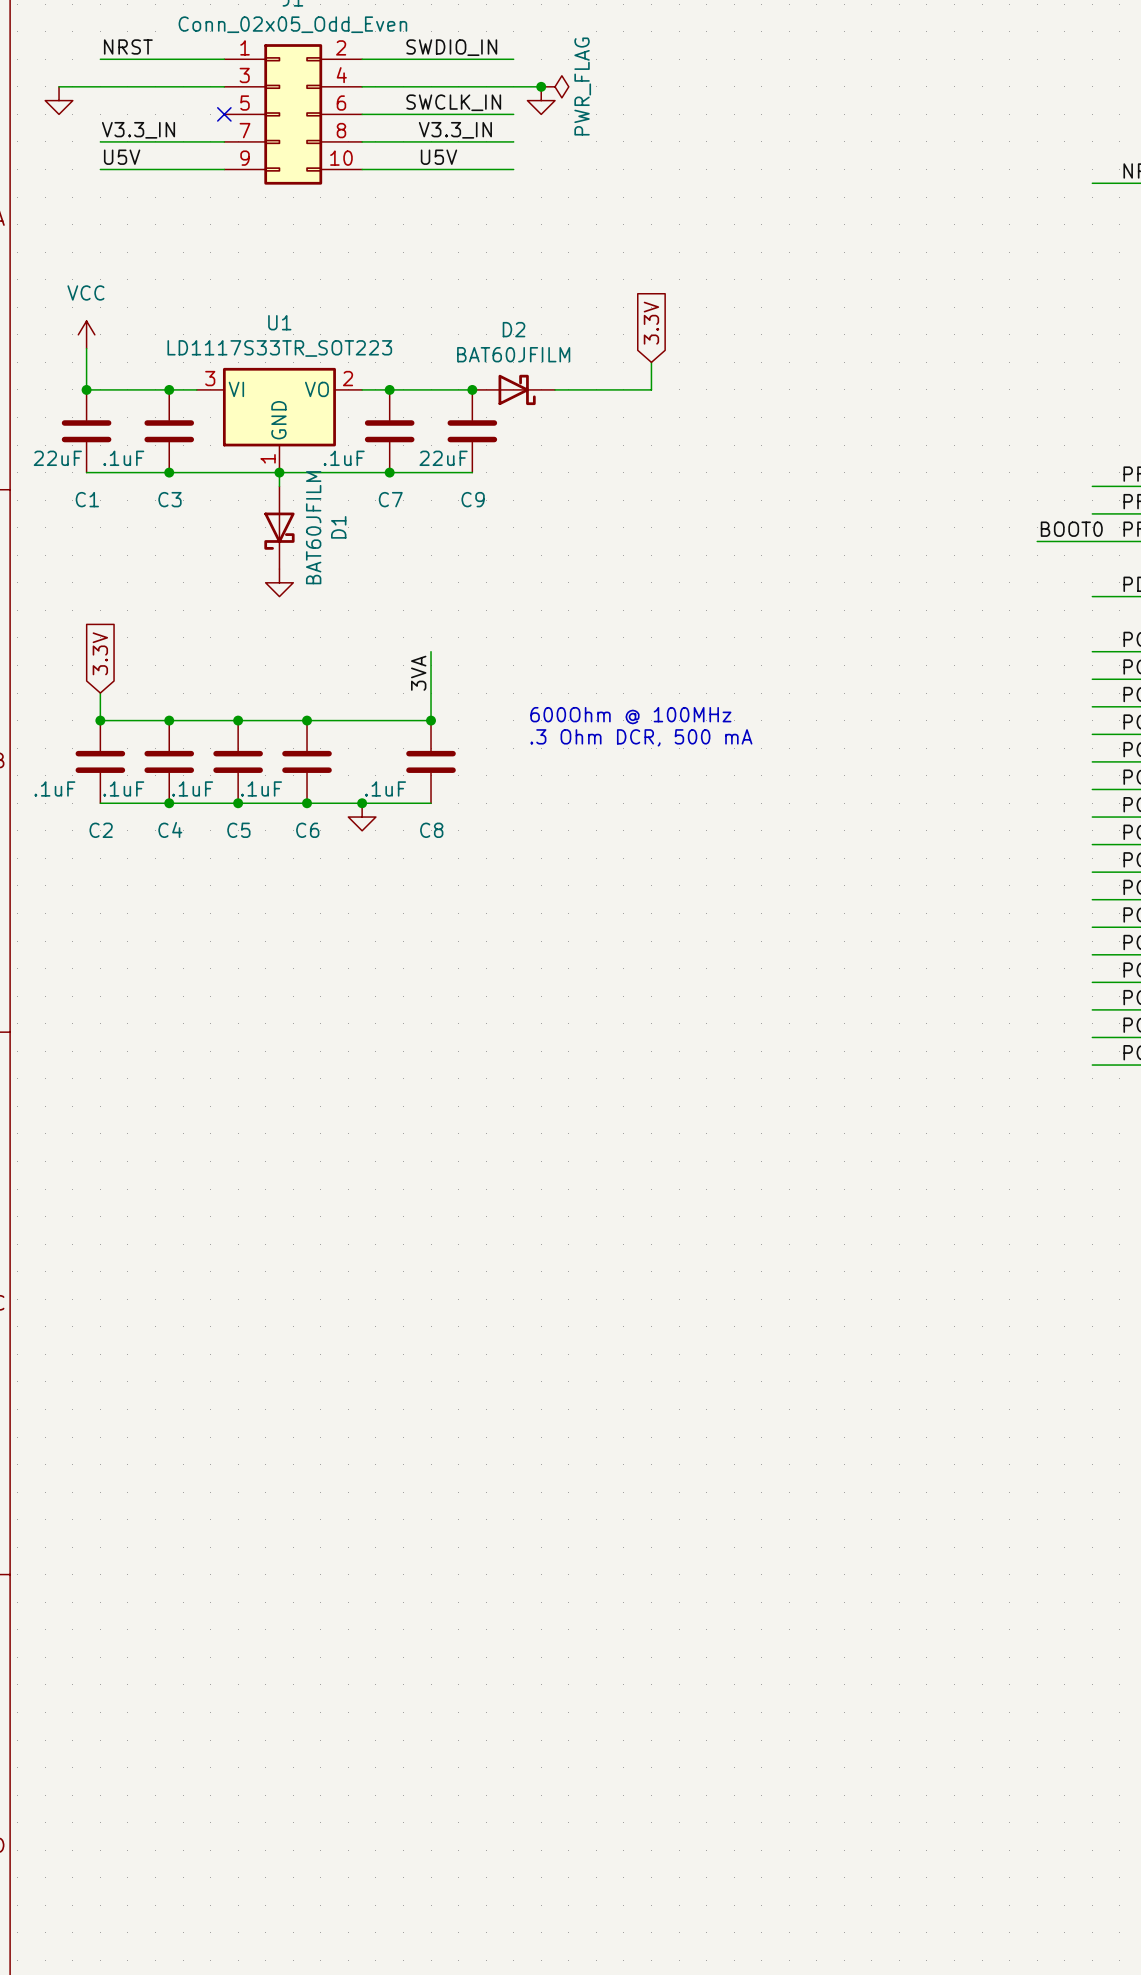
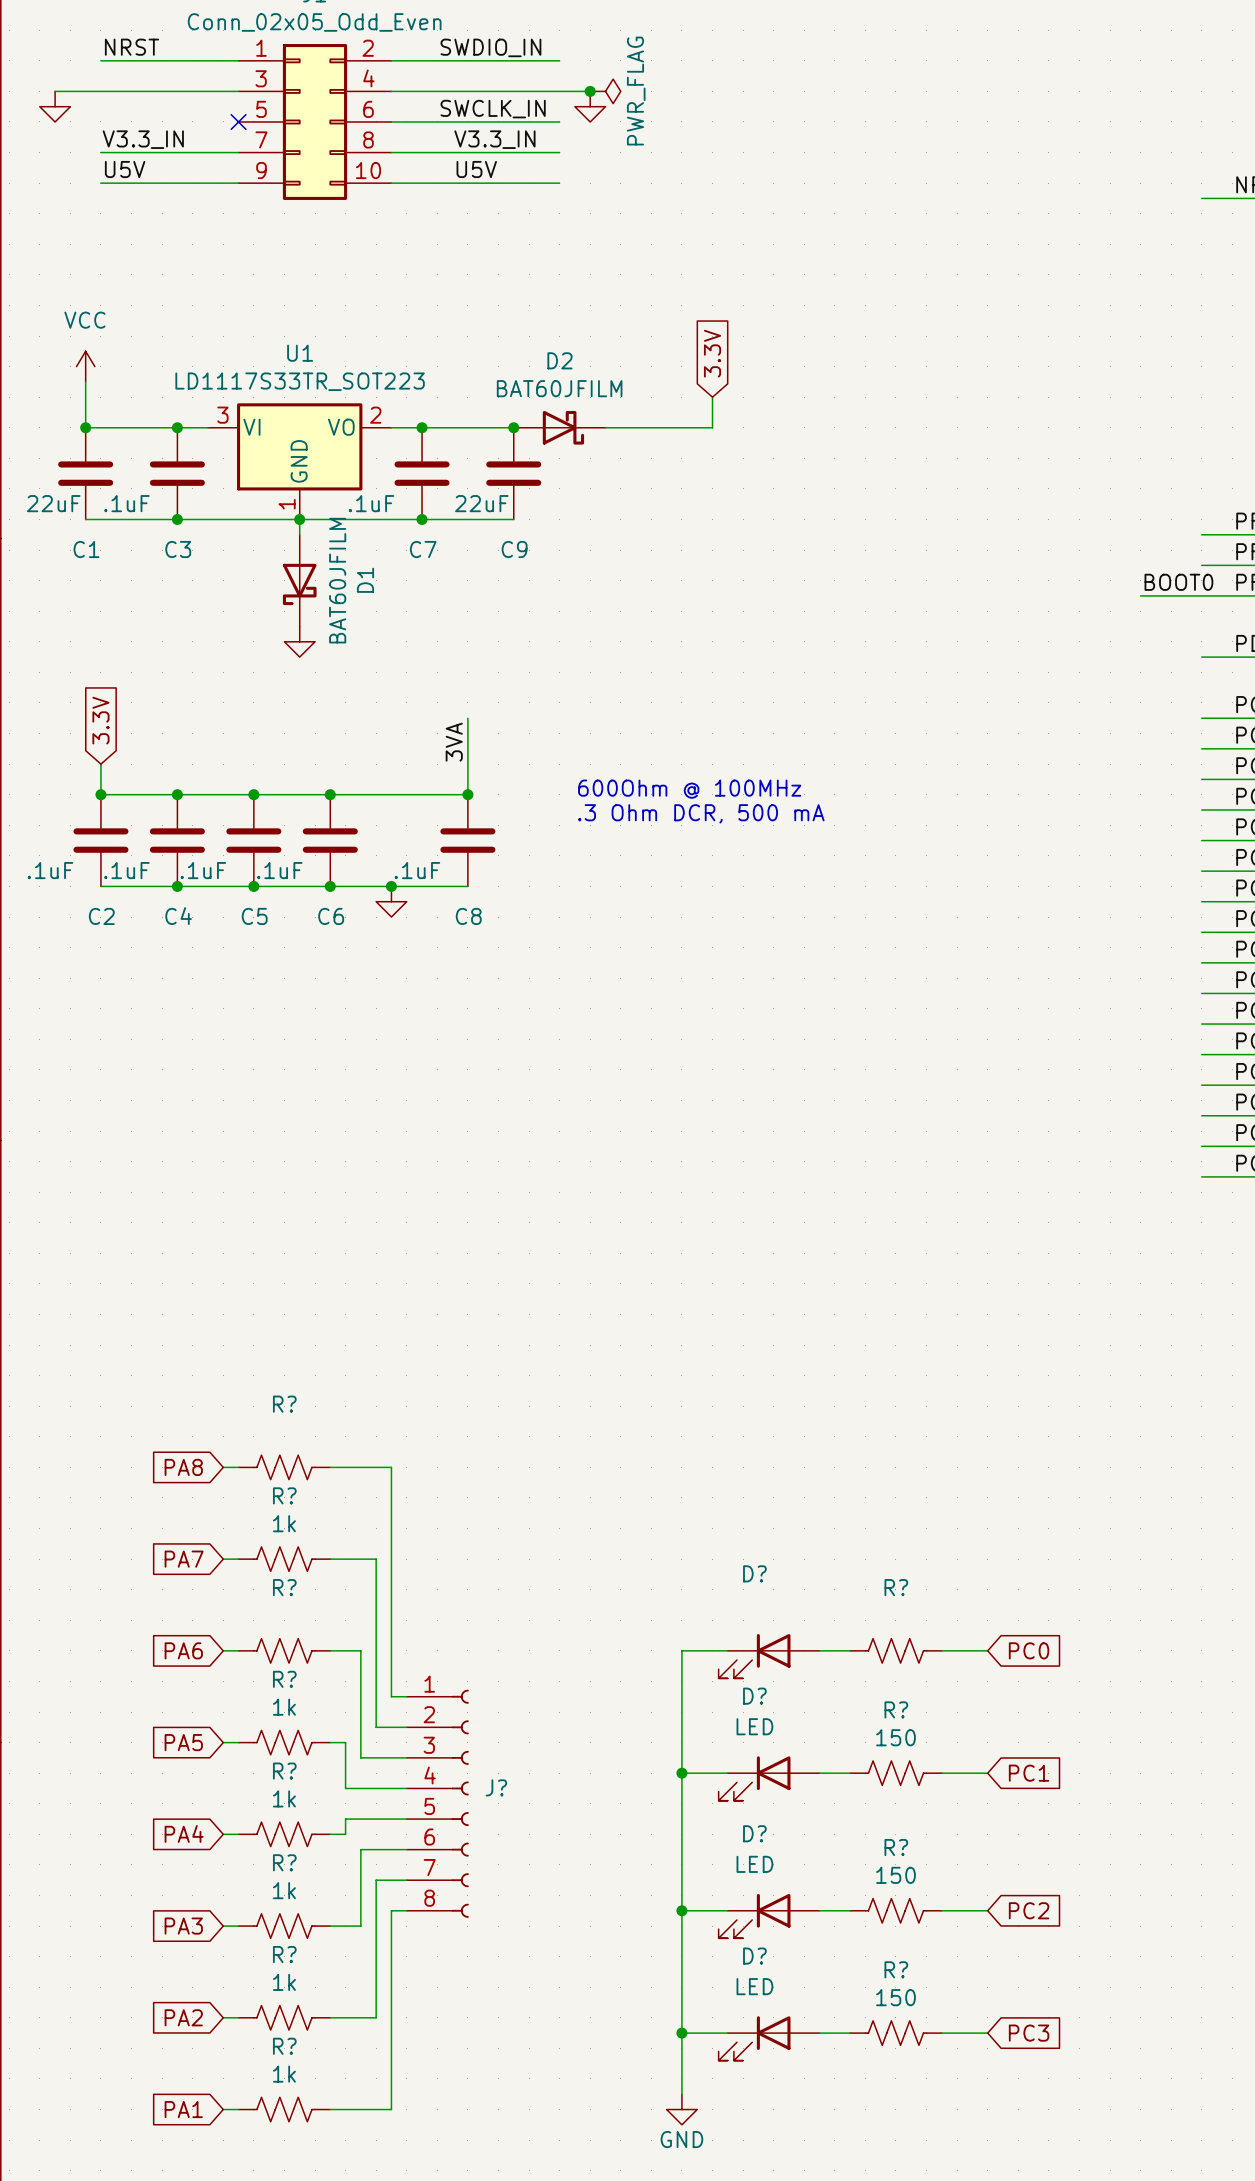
global label: none -> PA8 (183, 1467)
wire: none -> (223, 1467) (238, 1467)
R?: none -> (284, 1467)
wire: none -> (330, 1467) (391, 1467) (391, 1696) (406, 1696)
global label: none -> PA7 (184, 1559)
wire: none -> (223, 1559) (238, 1559)
R?: none -> 1k (284, 1559)
wire: none -> (330, 1559) (376, 1559) (376, 1727) (406, 1727)
global label: none -> PA6 (183, 1650)
wire: none -> (223, 1650) (238, 1650)
R?: none -> (284, 1650)
wire: none -> (330, 1650) (360, 1650) (360, 1757) (406, 1757)
wire: none -> (727, 1650) (681, 1650) (681, 2094)
wire: none -> (819, 1650) (850, 1650)
R?: none -> (895, 1650)
wire: none -> (941, 1650) (987, 1650)
global label: none -> PC0 (1029, 1650)
D?: none -> (769, 1656)
global label: none -> PA5 (183, 1742)
wire: none -> (223, 1742) (238, 1742)
R?: none -> 1k (284, 1742)
wire: none -> (330, 1742) (345, 1742) (345, 1788) (406, 1788)
wire: none -> (681, 1773) (727, 1773)
junction: none -> (681, 1773)
wire: none -> (819, 1773) (850, 1773)
R?: none -> 150 (895, 1773)
wire: none -> (941, 1773) (987, 1773)
global label: none -> PC1 (1029, 1773)
D?: none -> LED (769, 1778)
J?: none -> (437, 1803)
wire: none -> (406, 1819) (345, 1819) (345, 1834) (330, 1834)
global label: none -> PA4 (184, 1833)
wire: none -> (223, 1834) (238, 1834)
R?: none -> 1k (284, 1834)
wire: none -> (406, 1849) (360, 1849) (360, 1926) (330, 1926)
wire: none -> (406, 1880) (376, 1880) (376, 2017) (330, 2017)
wire: none -> (406, 1910) (391, 1910) (391, 2109) (330, 2109)
wire: none -> (681, 1910) (727, 1910)
junction: none -> (681, 1910)
wire: none -> (819, 1910) (850, 1910)
R?: none -> 150 (895, 1910)
wire: none -> (941, 1910) (987, 1910)
global label: none -> PC2 (1029, 1910)
D?: none -> LED (769, 1916)
global label: none -> PA3 (183, 1926)
wire: none -> (223, 1926) (238, 1926)
R?: none -> 1k (284, 1926)
global label: none -> PA2 (183, 2017)
wire: none -> (223, 2017) (238, 2017)
R?: none -> 1k (284, 2017)
wire: none -> (681, 2033) (727, 2033)
junction: none -> (681, 2033)
wire: none -> (819, 2033) (850, 2033)
R?: none -> 150 (895, 2033)
wire: none -> (941, 2033) (987, 2033)
global label: none -> PC3 (1029, 2033)
D?: none -> LED (769, 2038)
global label: none -> PA1 (183, 2109)
wire: none -> (223, 2109) (238, 2109)
R?: none -> 1k (284, 2109)
power symbol: none -> GND (681, 2109)

